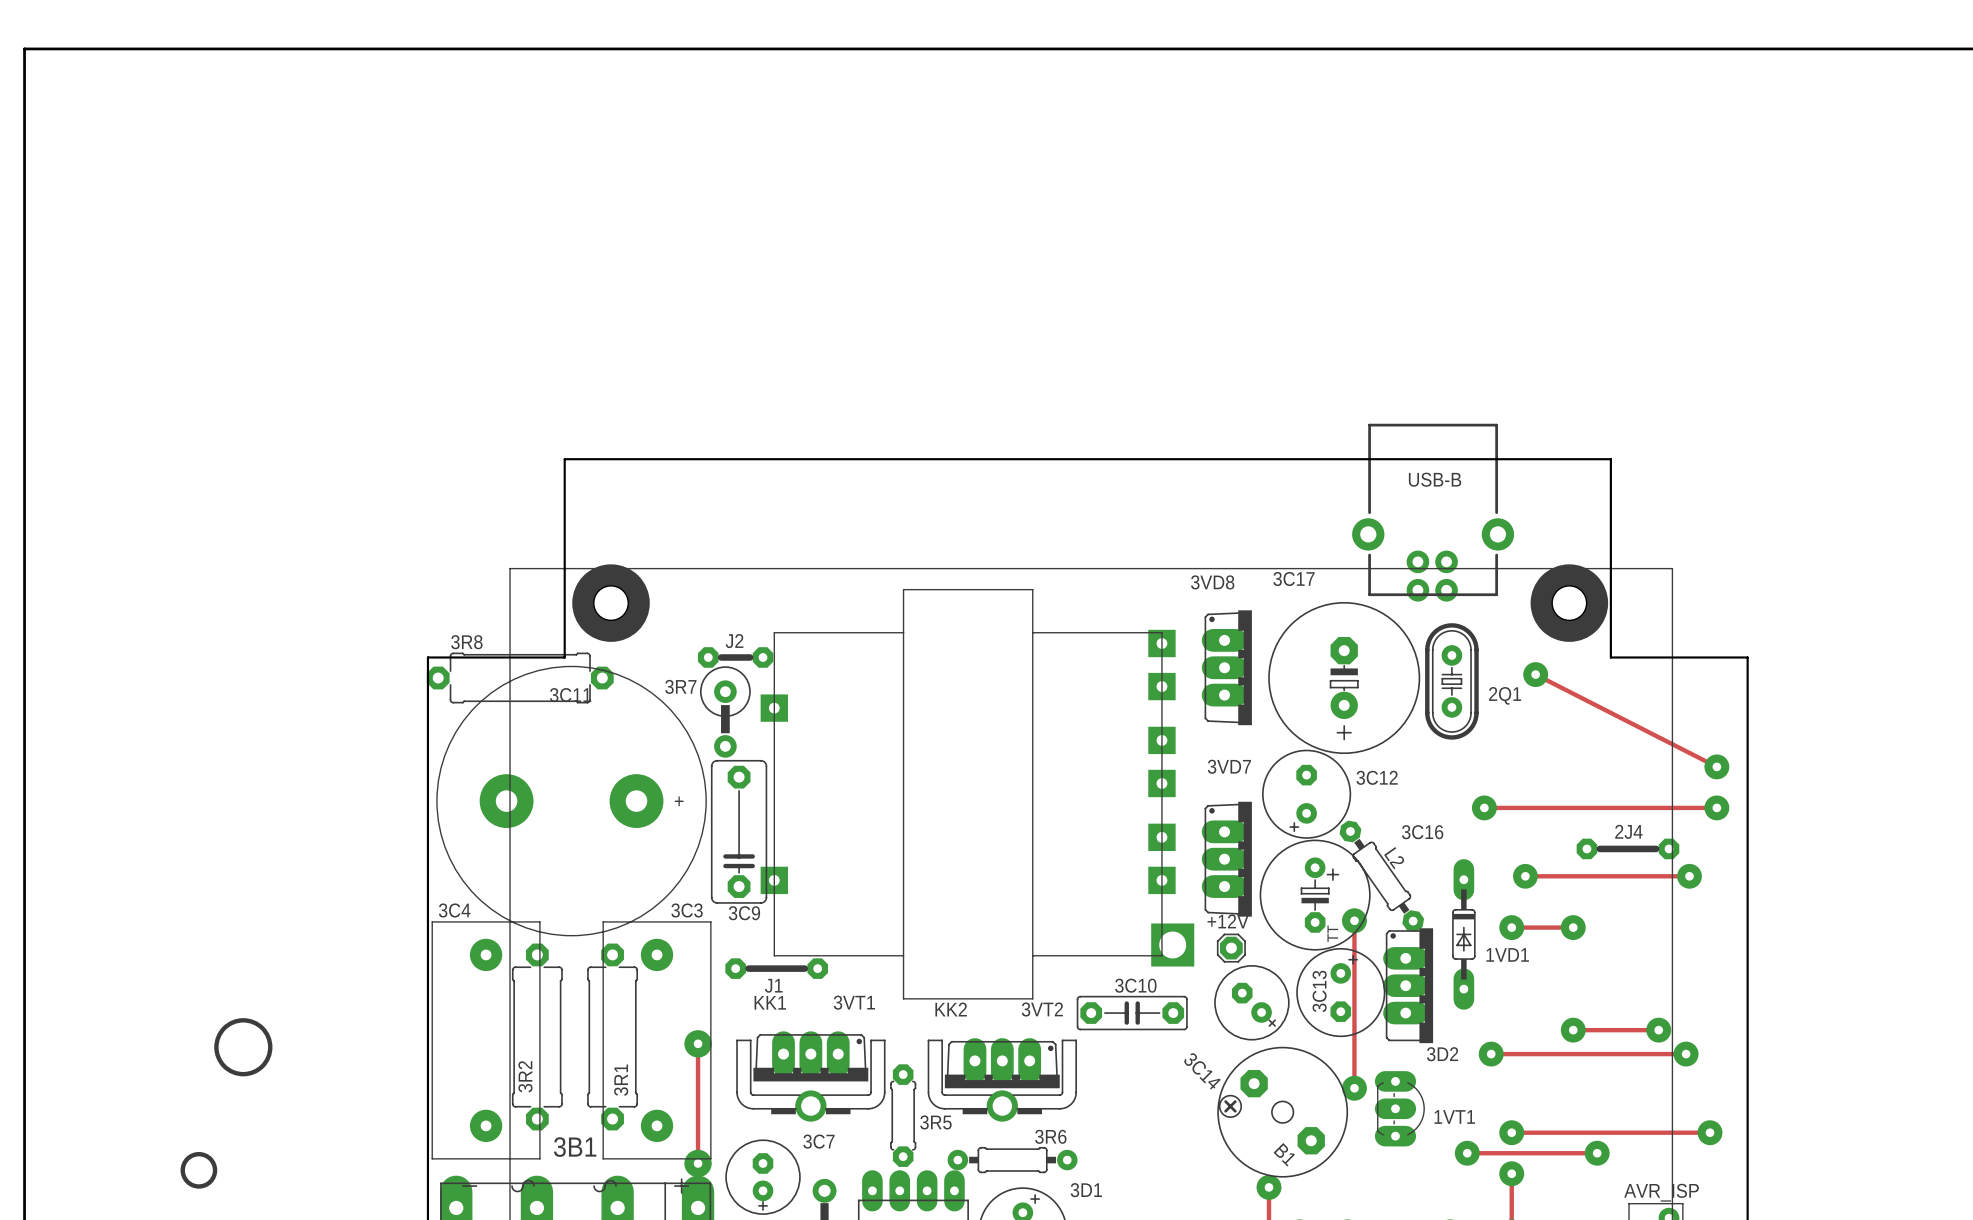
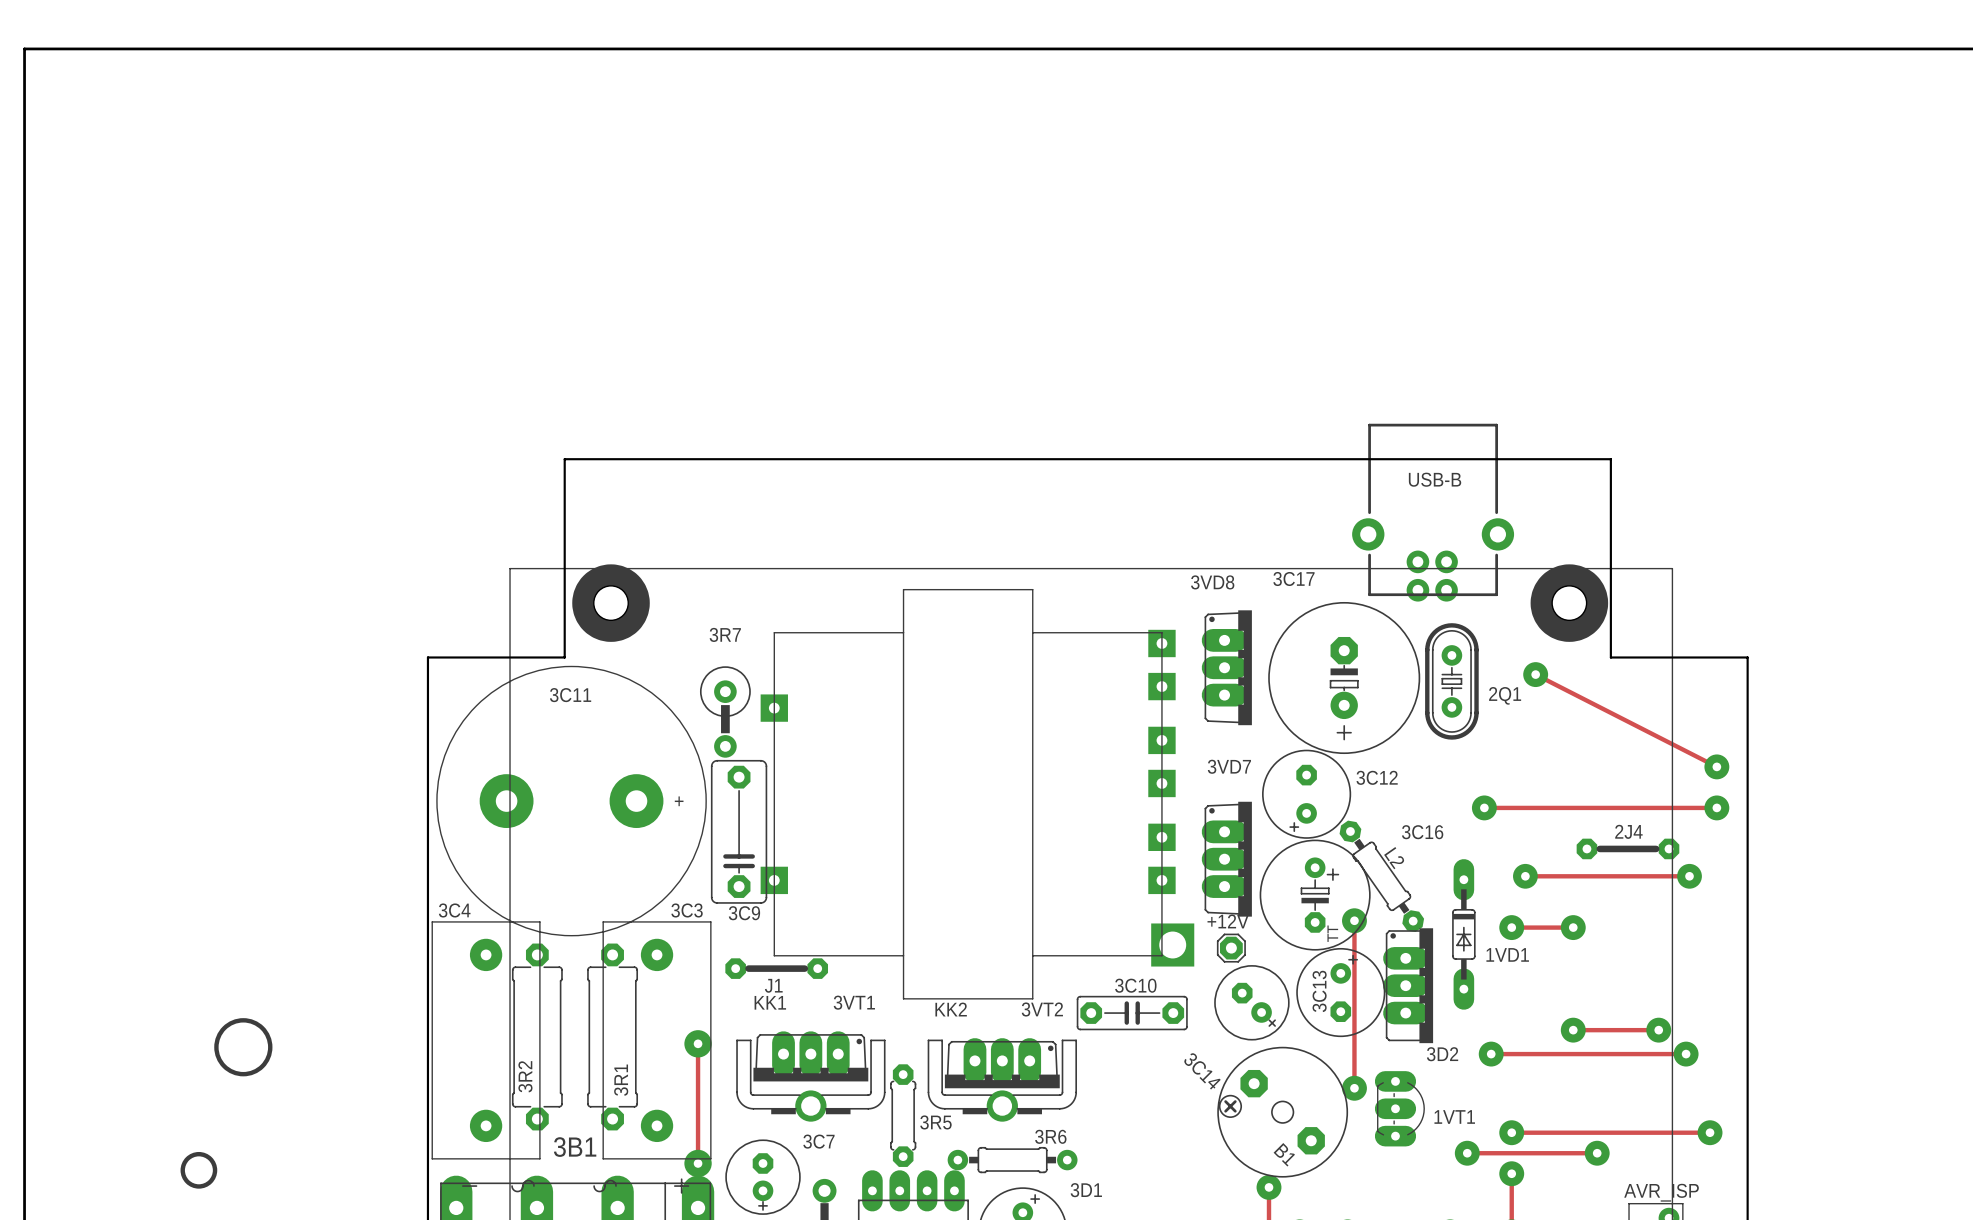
J2: (735, 657) -> none
3R8: (520, 678) -> none
3R7 name position: 3R7 (680, 686) -> 3R7 (725, 634)

